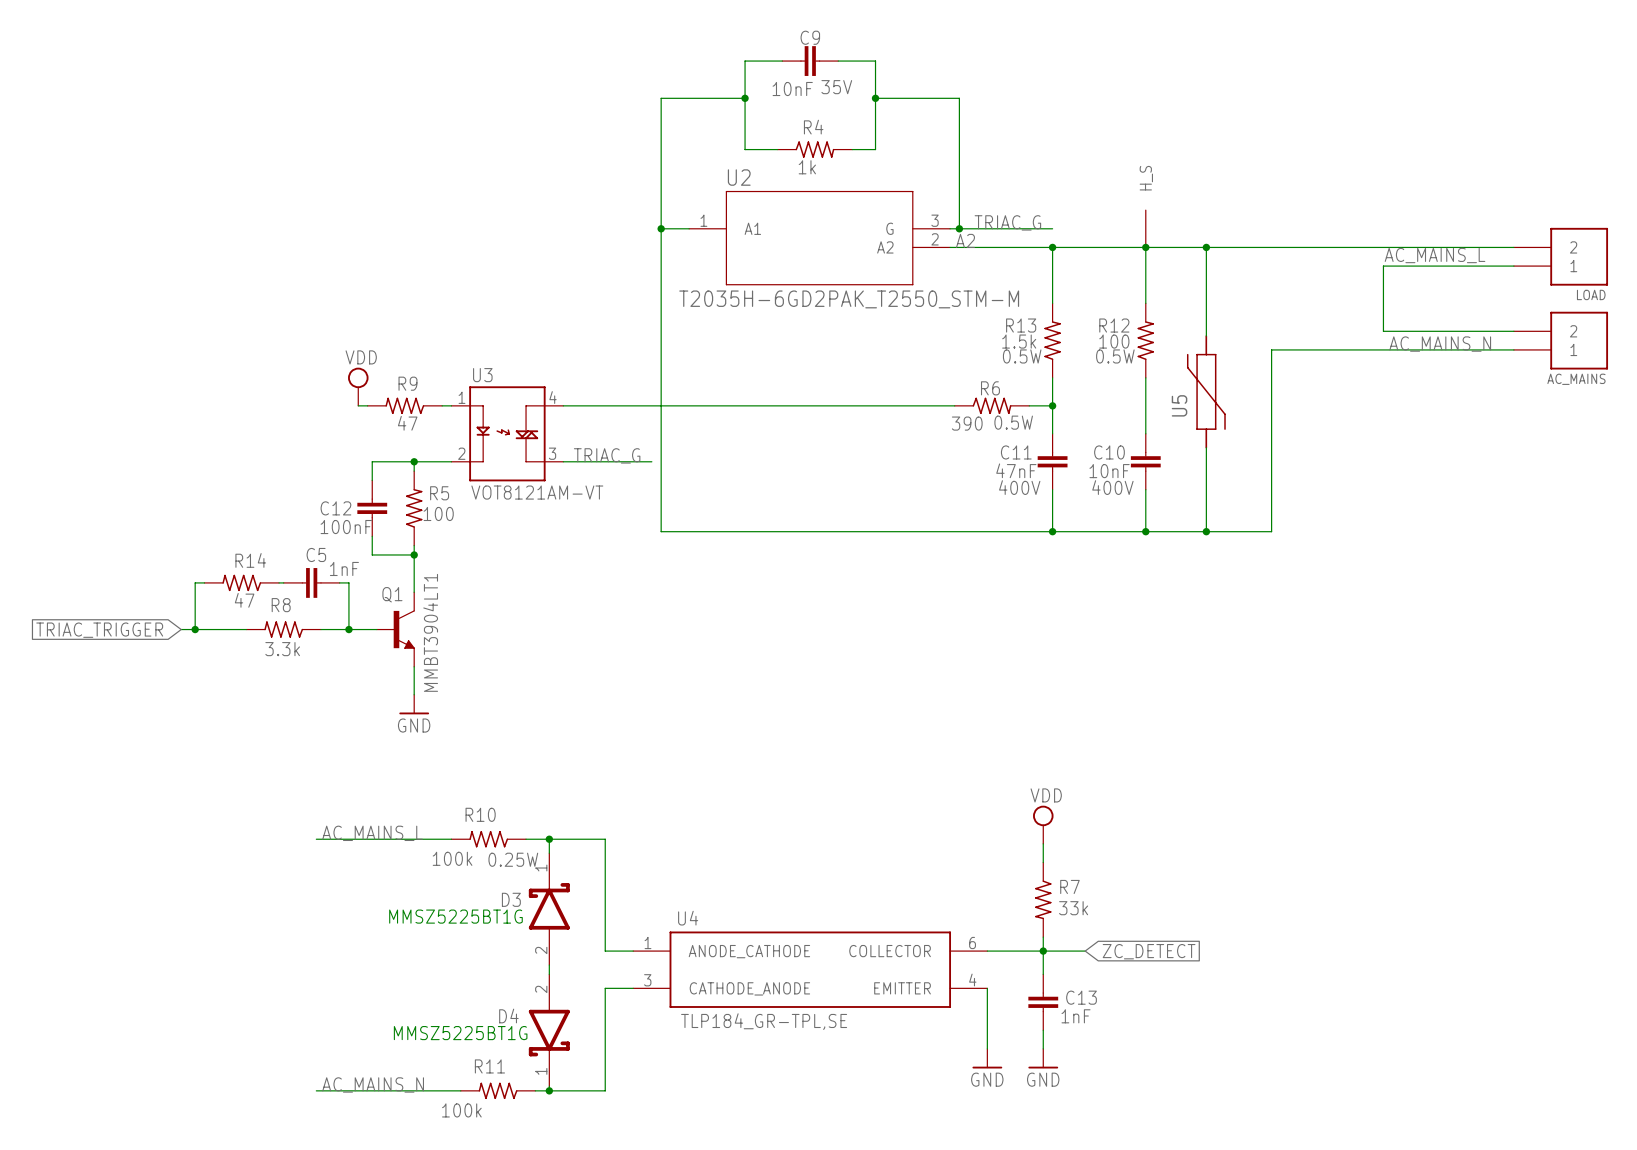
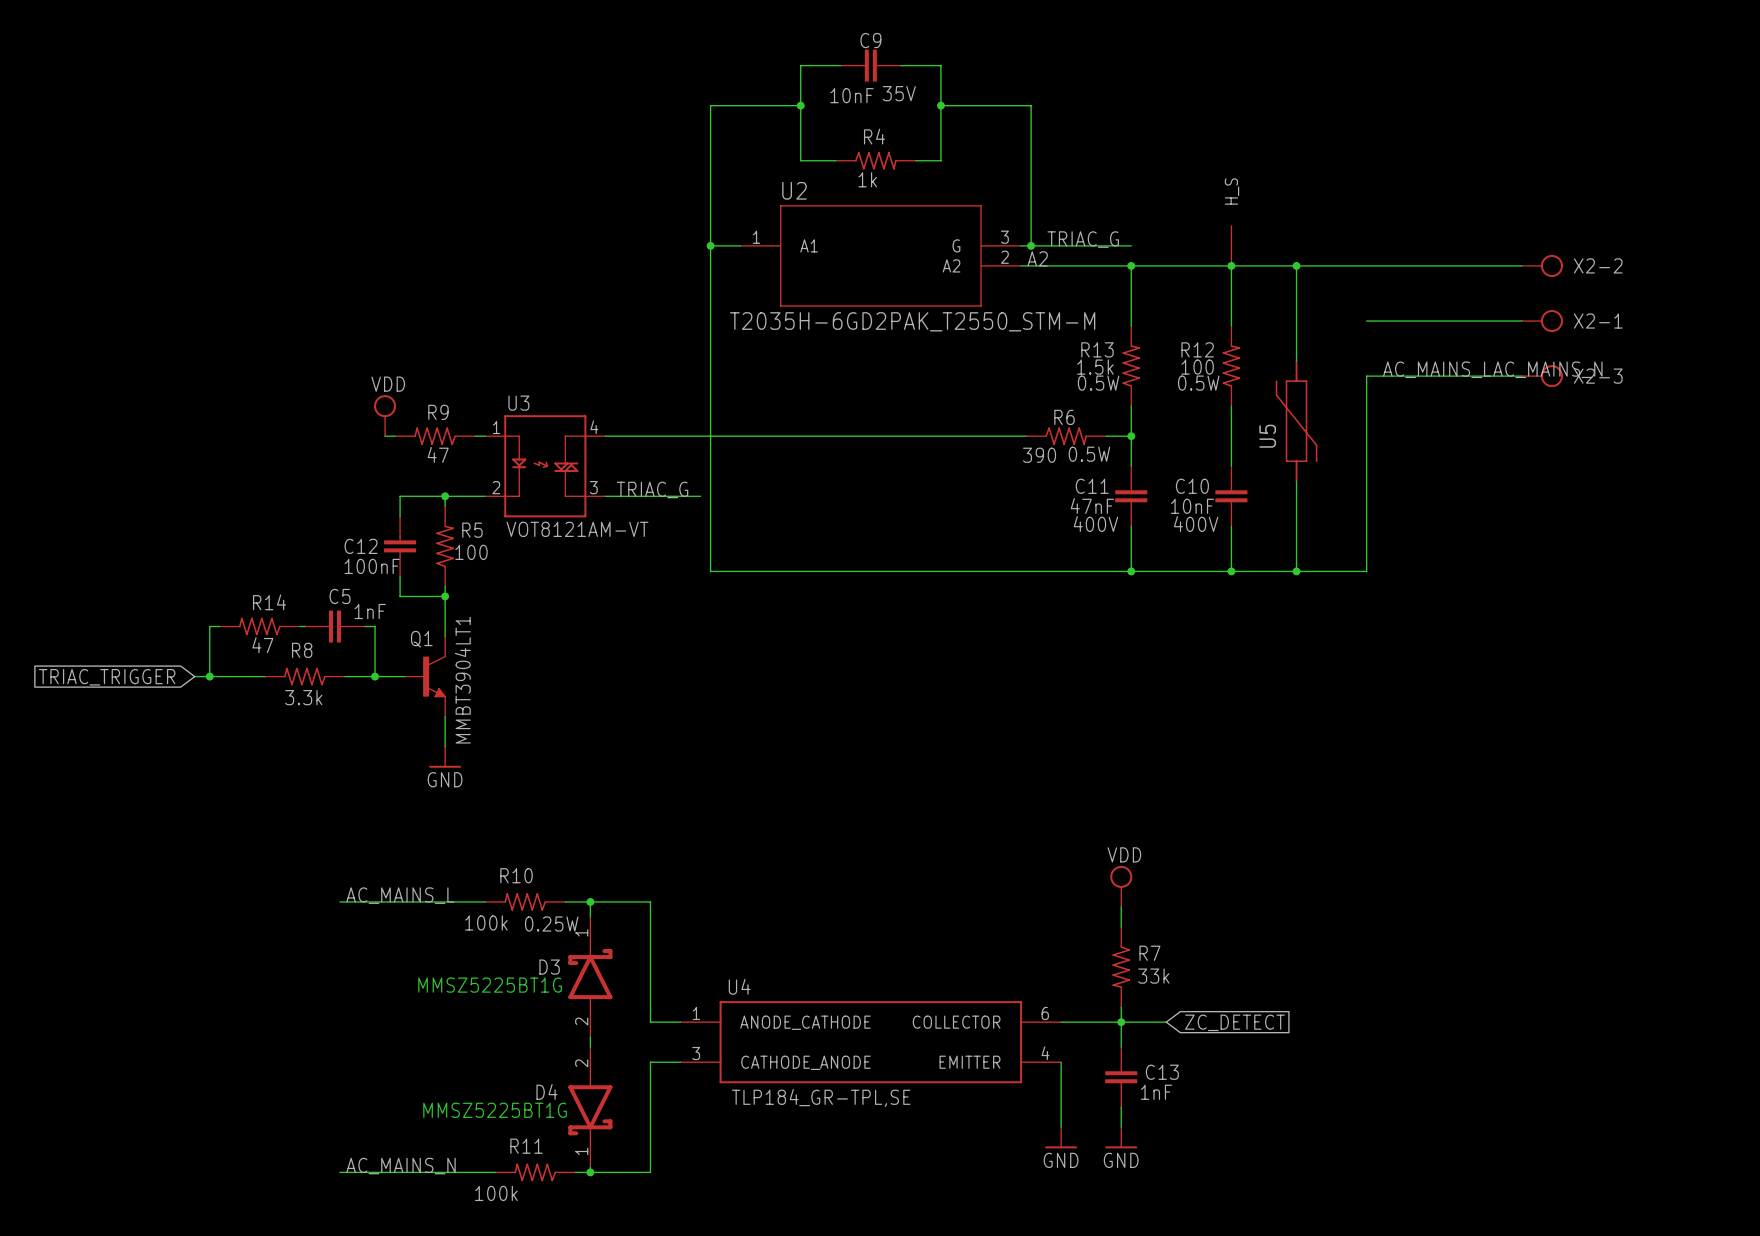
wire: (1416, 247) (1513, 247) -> none
X2-2: none -> (1542, 265)
label position: AC_MAINS_L (1435, 255) -> AC_MAINS_L (1437, 369)
LOAD: (1560, 256) -> none
wire: (1513, 266) (1383, 266) (1383, 331) (1513, 331) -> none
wire: none -> (1366, 321) (1521, 321)
X2-1: none -> (1542, 321)
AC_MAINS: (1560, 340) -> none
wire: (1416, 349) (1513, 349) -> none
X2-3: none -> (1542, 376)

